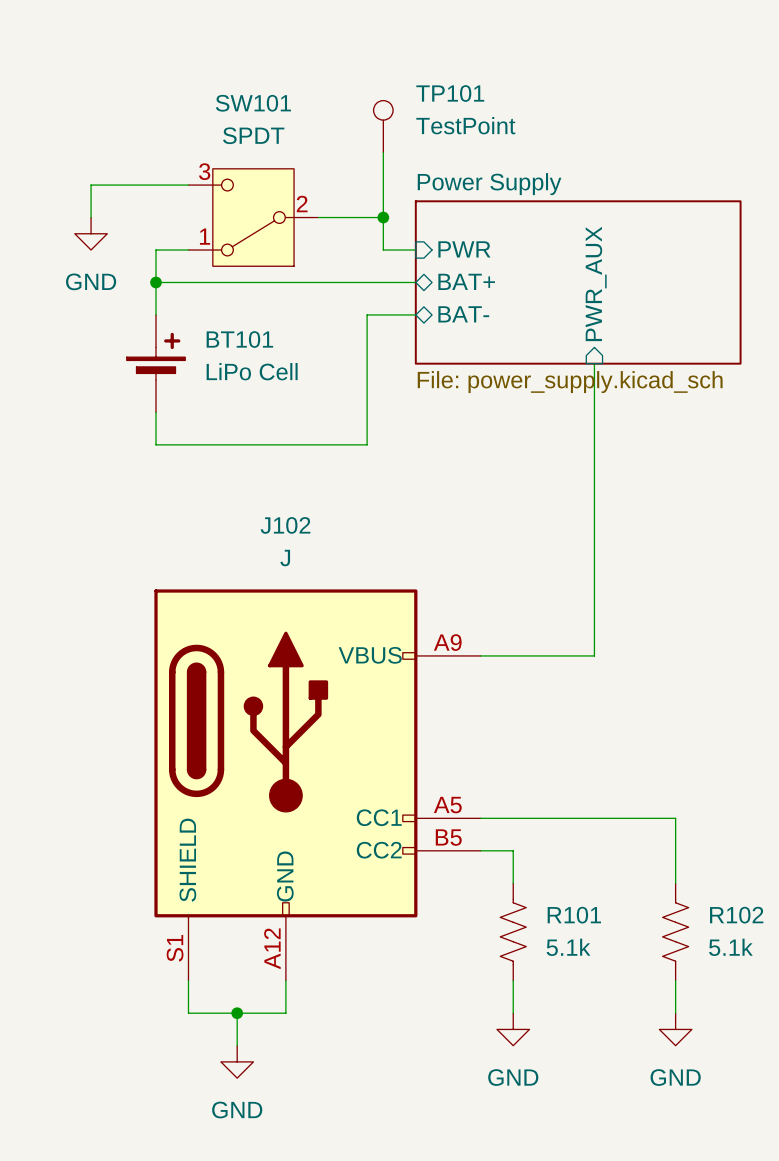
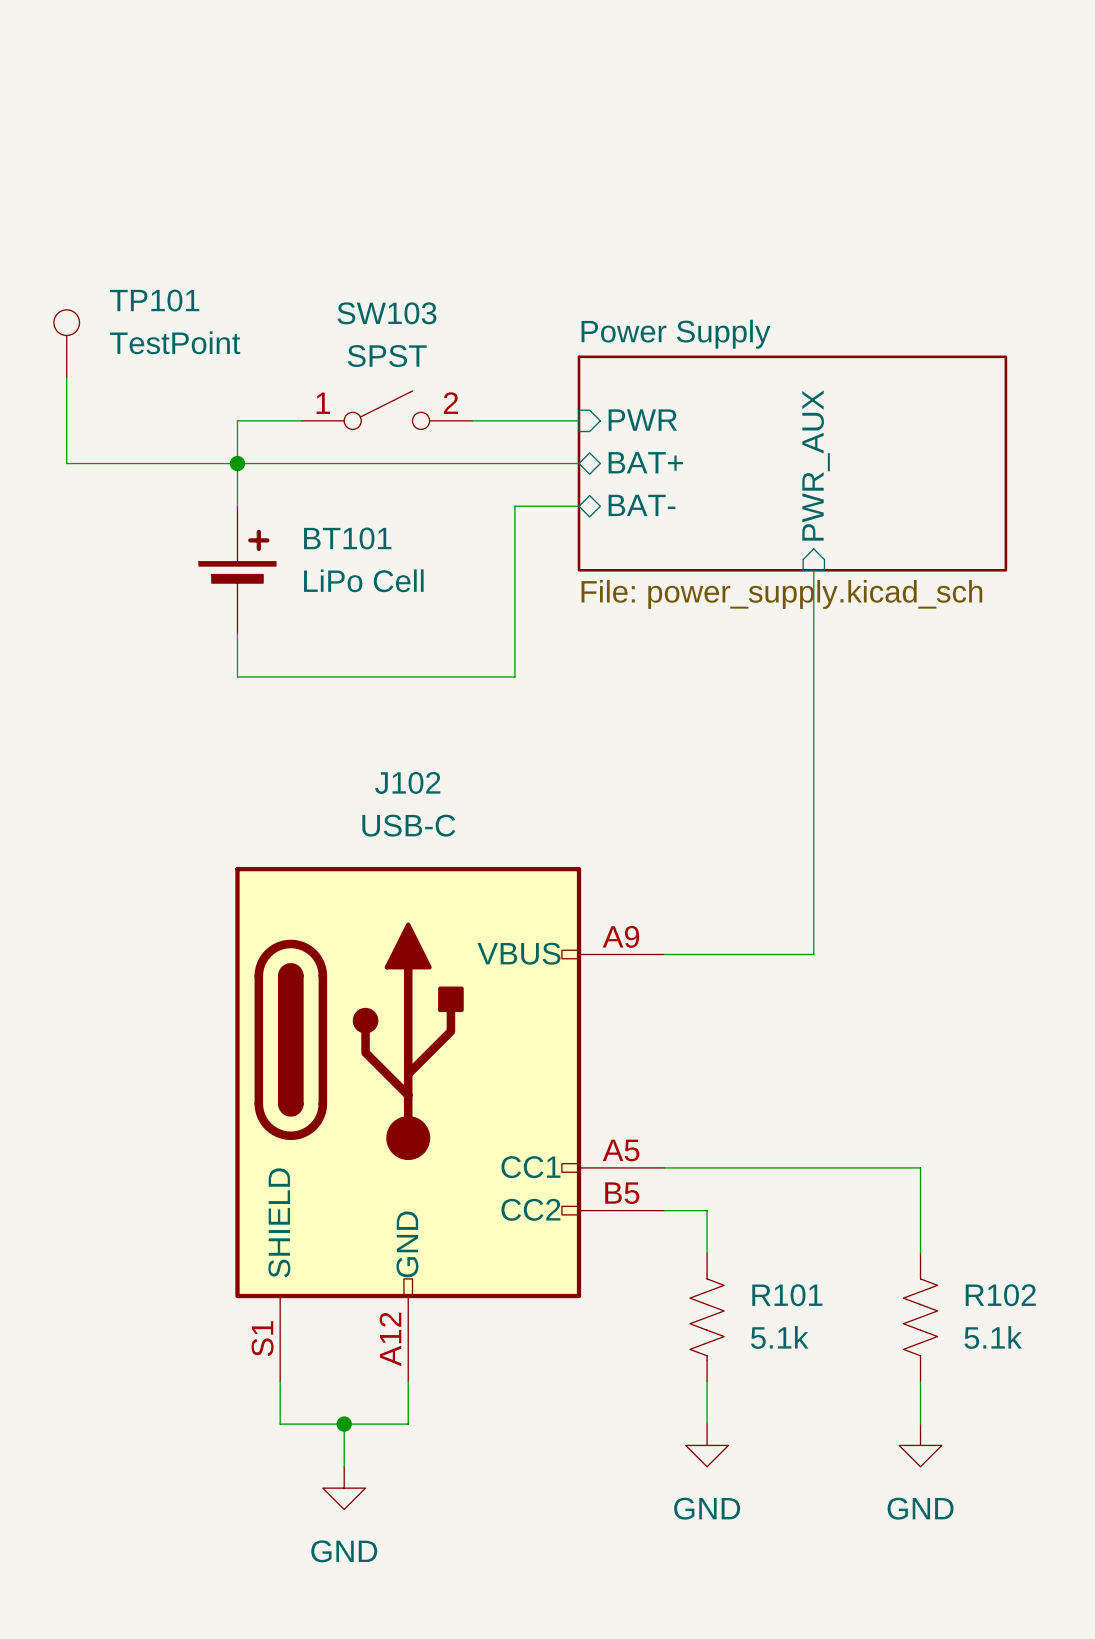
TP101 position: (383, 126) -> (66, 344)
wire: (383, 152) (383, 250) -> (472, 420) (536, 420)
wire: (188, 185) (91, 185) (91, 217) -> none
wire: none -> (66, 378) (66, 463) (237, 463)
SW101: SPDT (253, 217) -> none
wire: (318, 217) (383, 217) -> none
junction: (383, 217) -> none
power symbol: GND (91, 233) -> none
SW103: none -> SPST (386, 410)
J102 value: J (285, 558) -> USB-C (408, 825)

